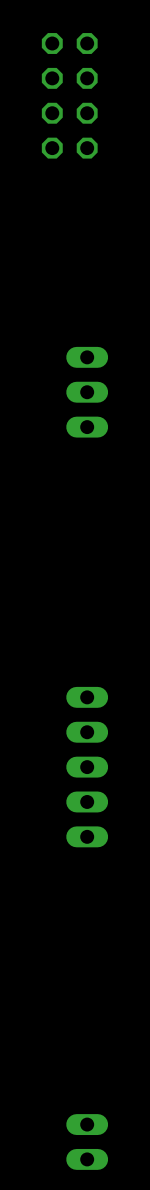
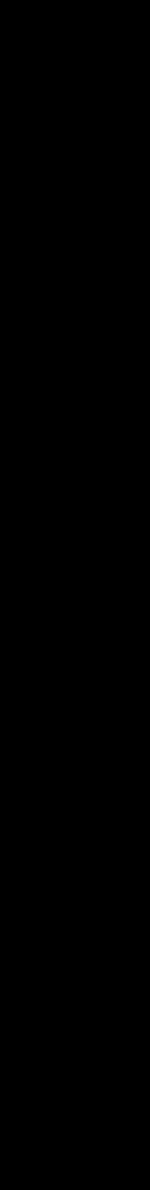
part: (69, 95) -> none
part: (87, 392) -> none
part: (87, 767) -> none
part: (87, 1141) -> none

